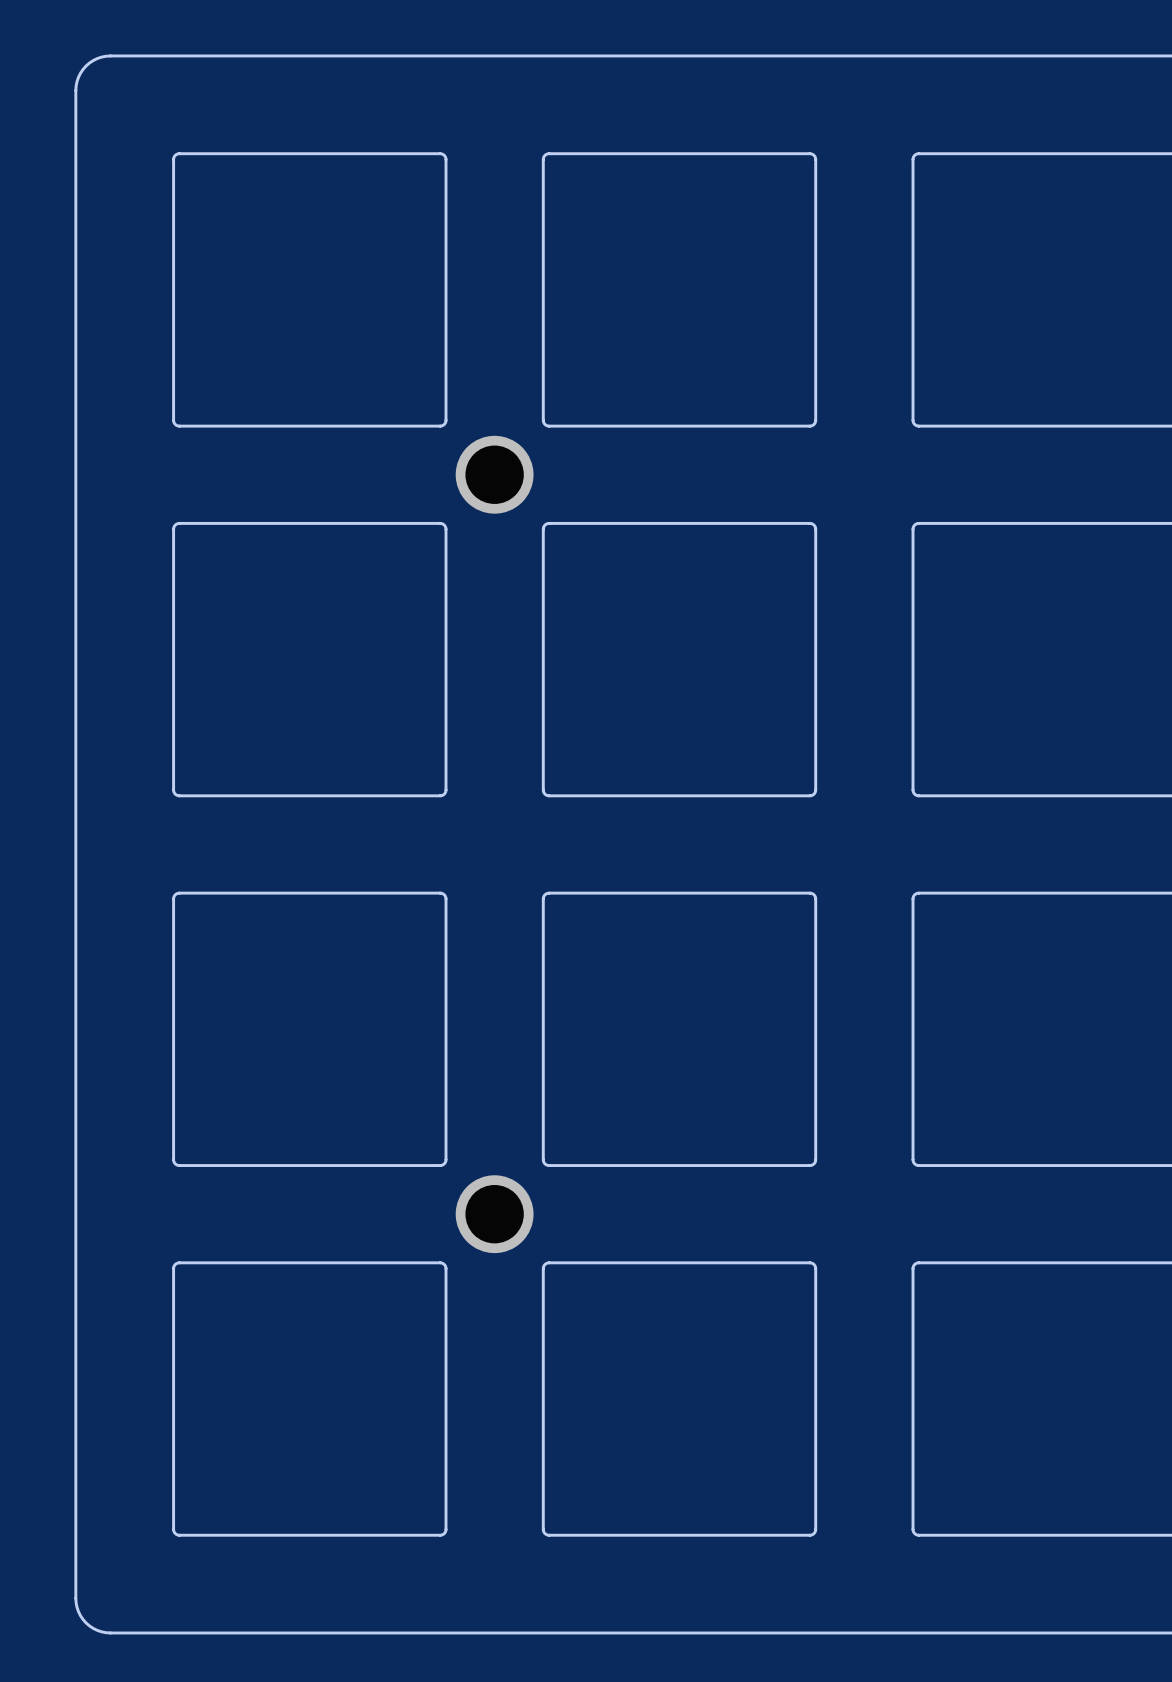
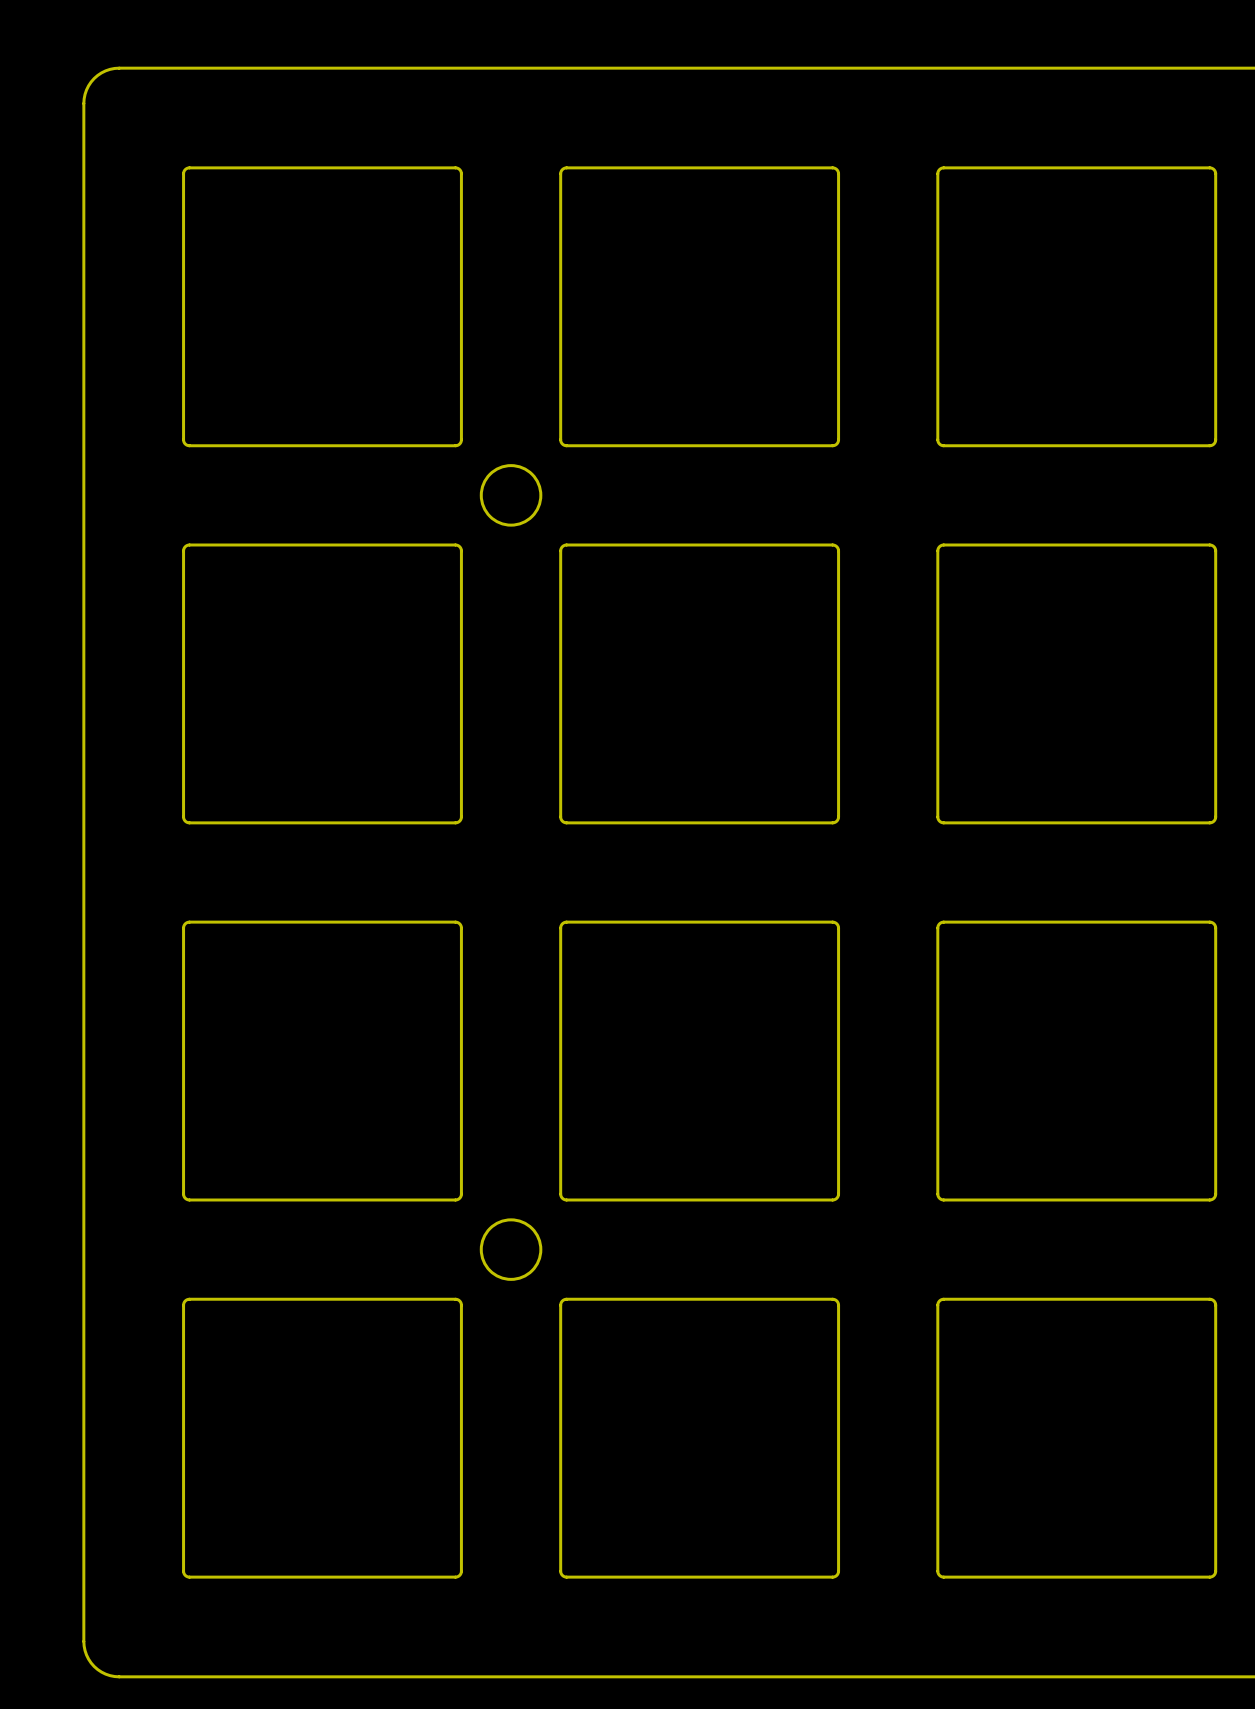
round board edge: none -> [479, 464, 543, 527]
via: (494, 474) -> none
round board edge: none -> [479, 1218, 543, 1281]
via: (494, 1214) -> none

